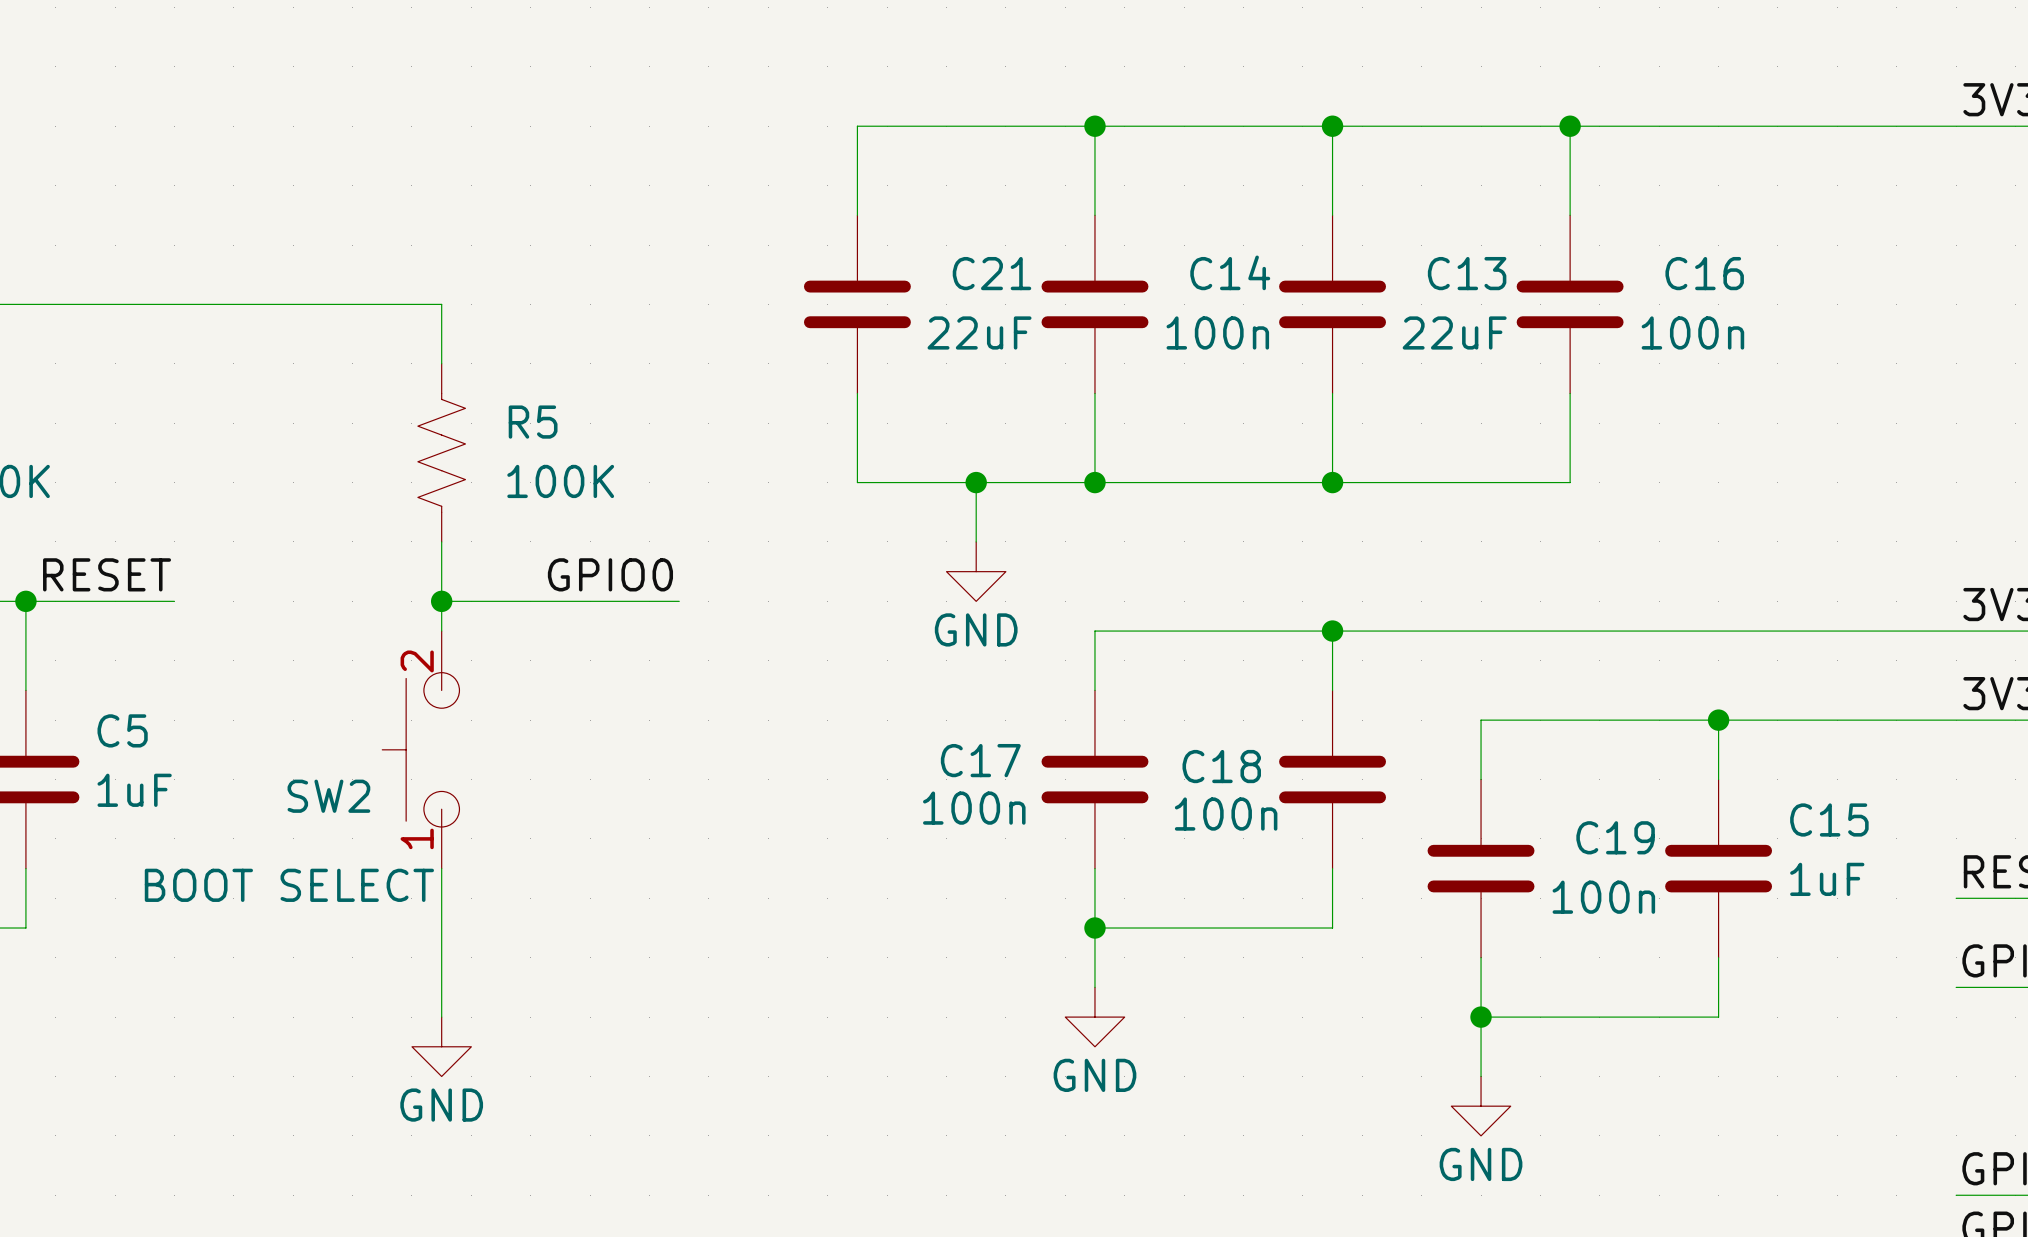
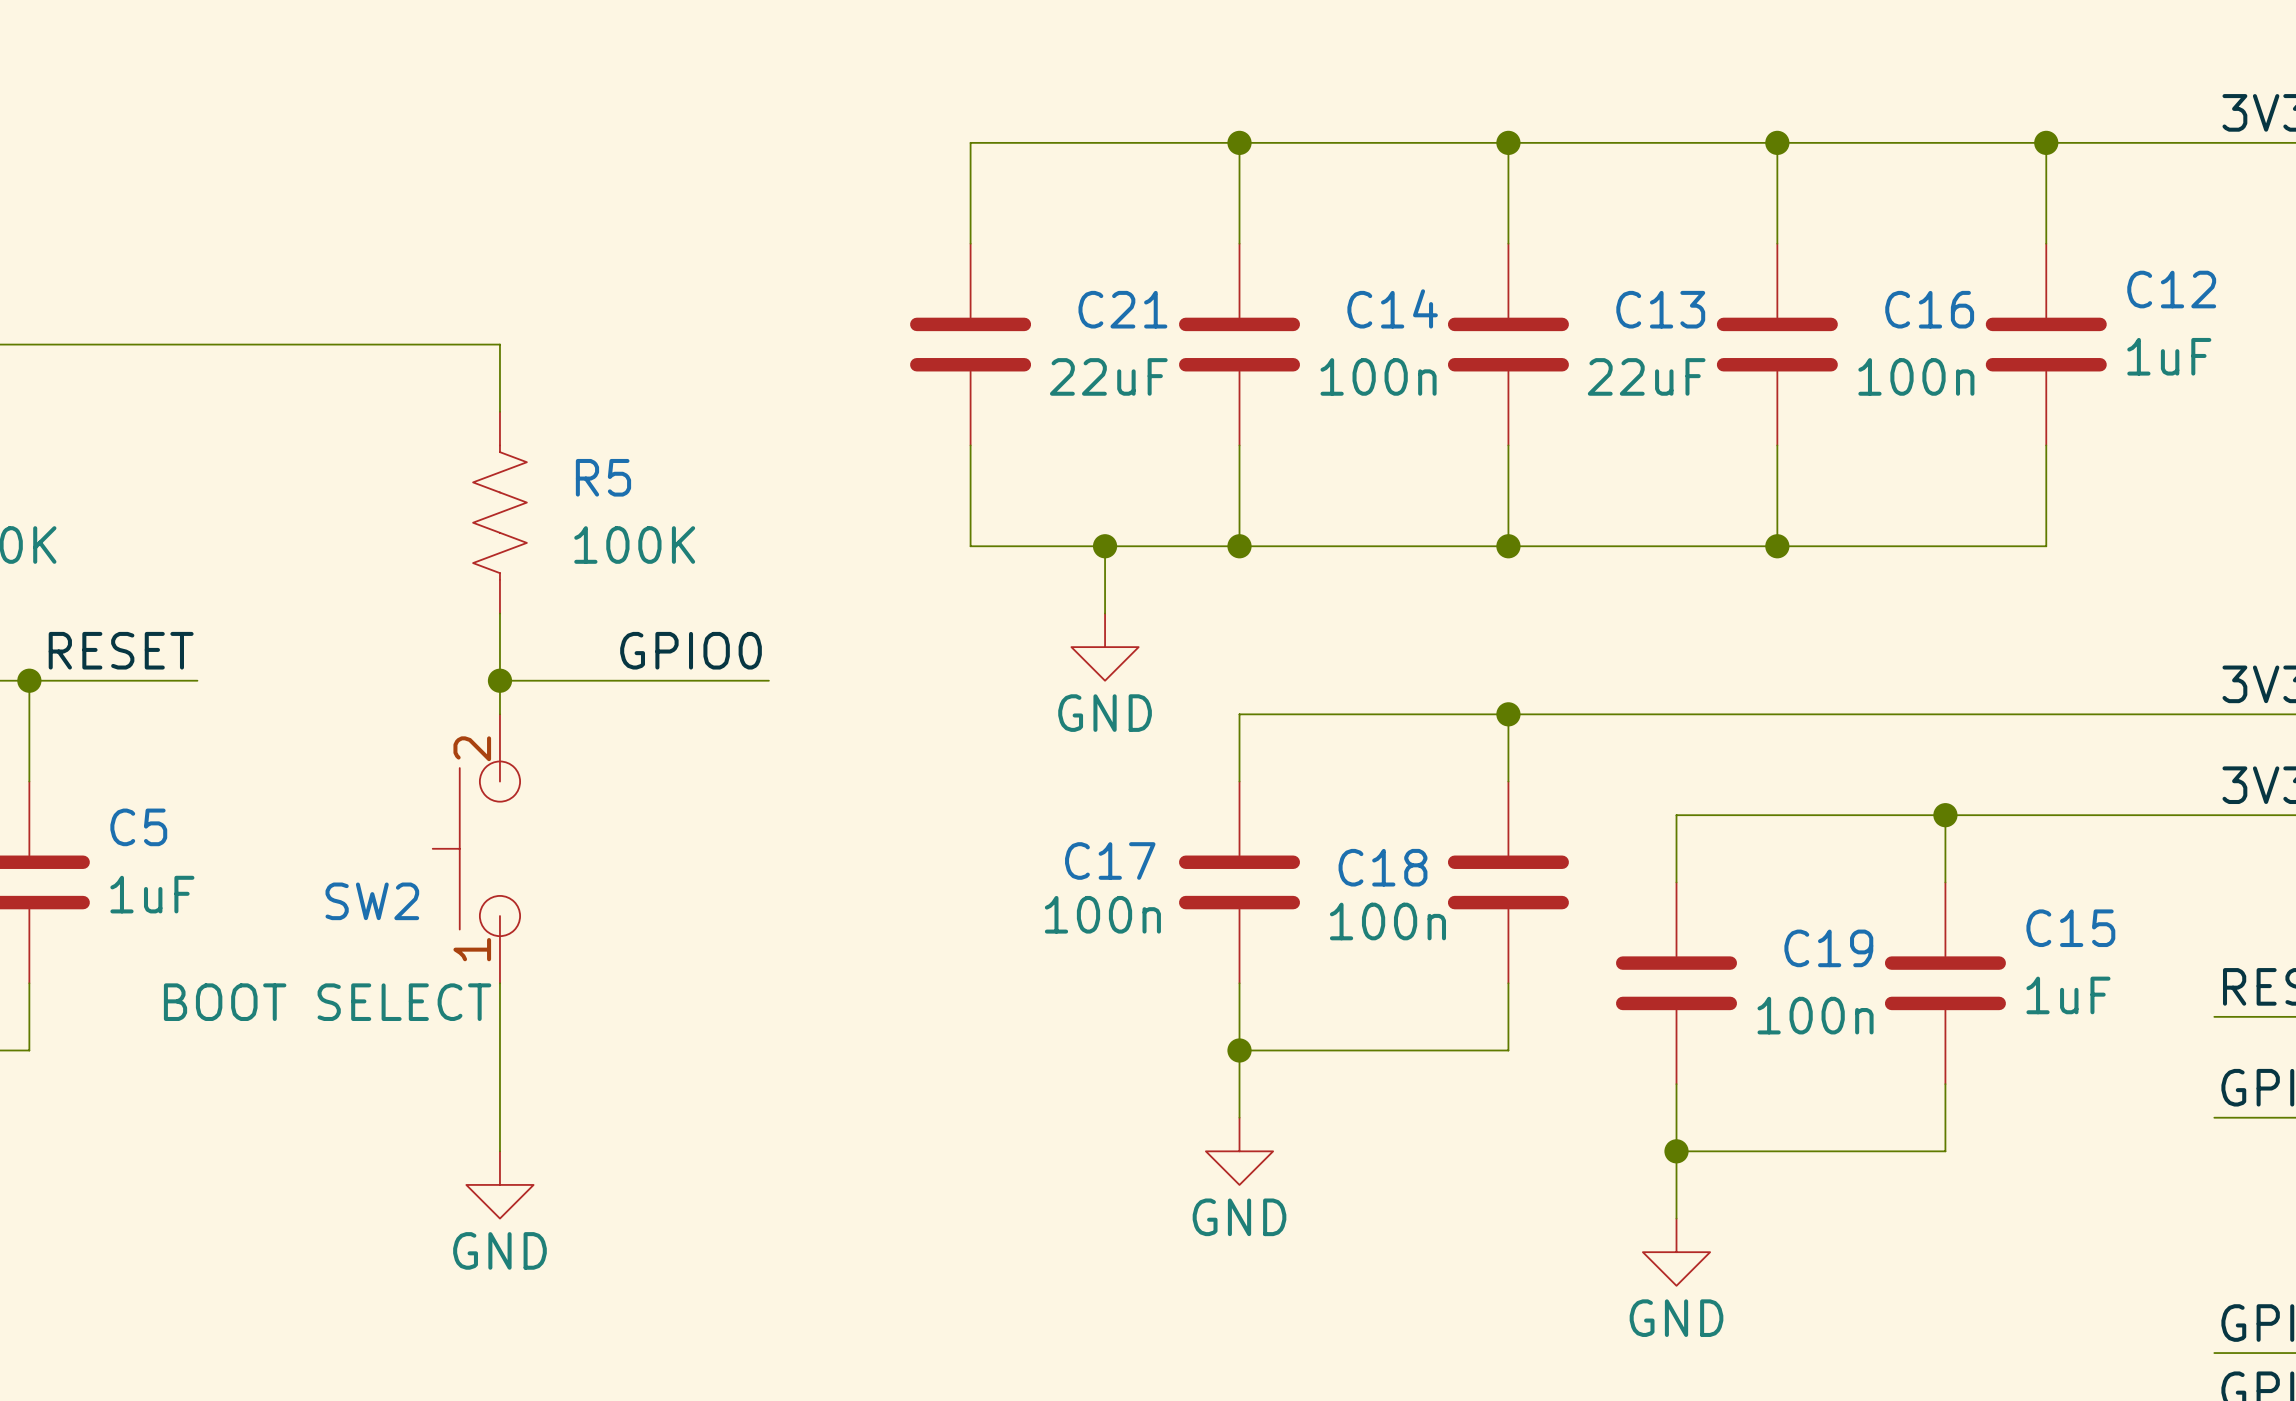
wire: none -> (2046, 142) (2046, 243)
junction: none -> (2046, 142)
C12: none -> 1uF (2046, 344)
wire: none -> (2046, 445) (2046, 546) (1777, 546)
junction: none -> (1777, 546)

